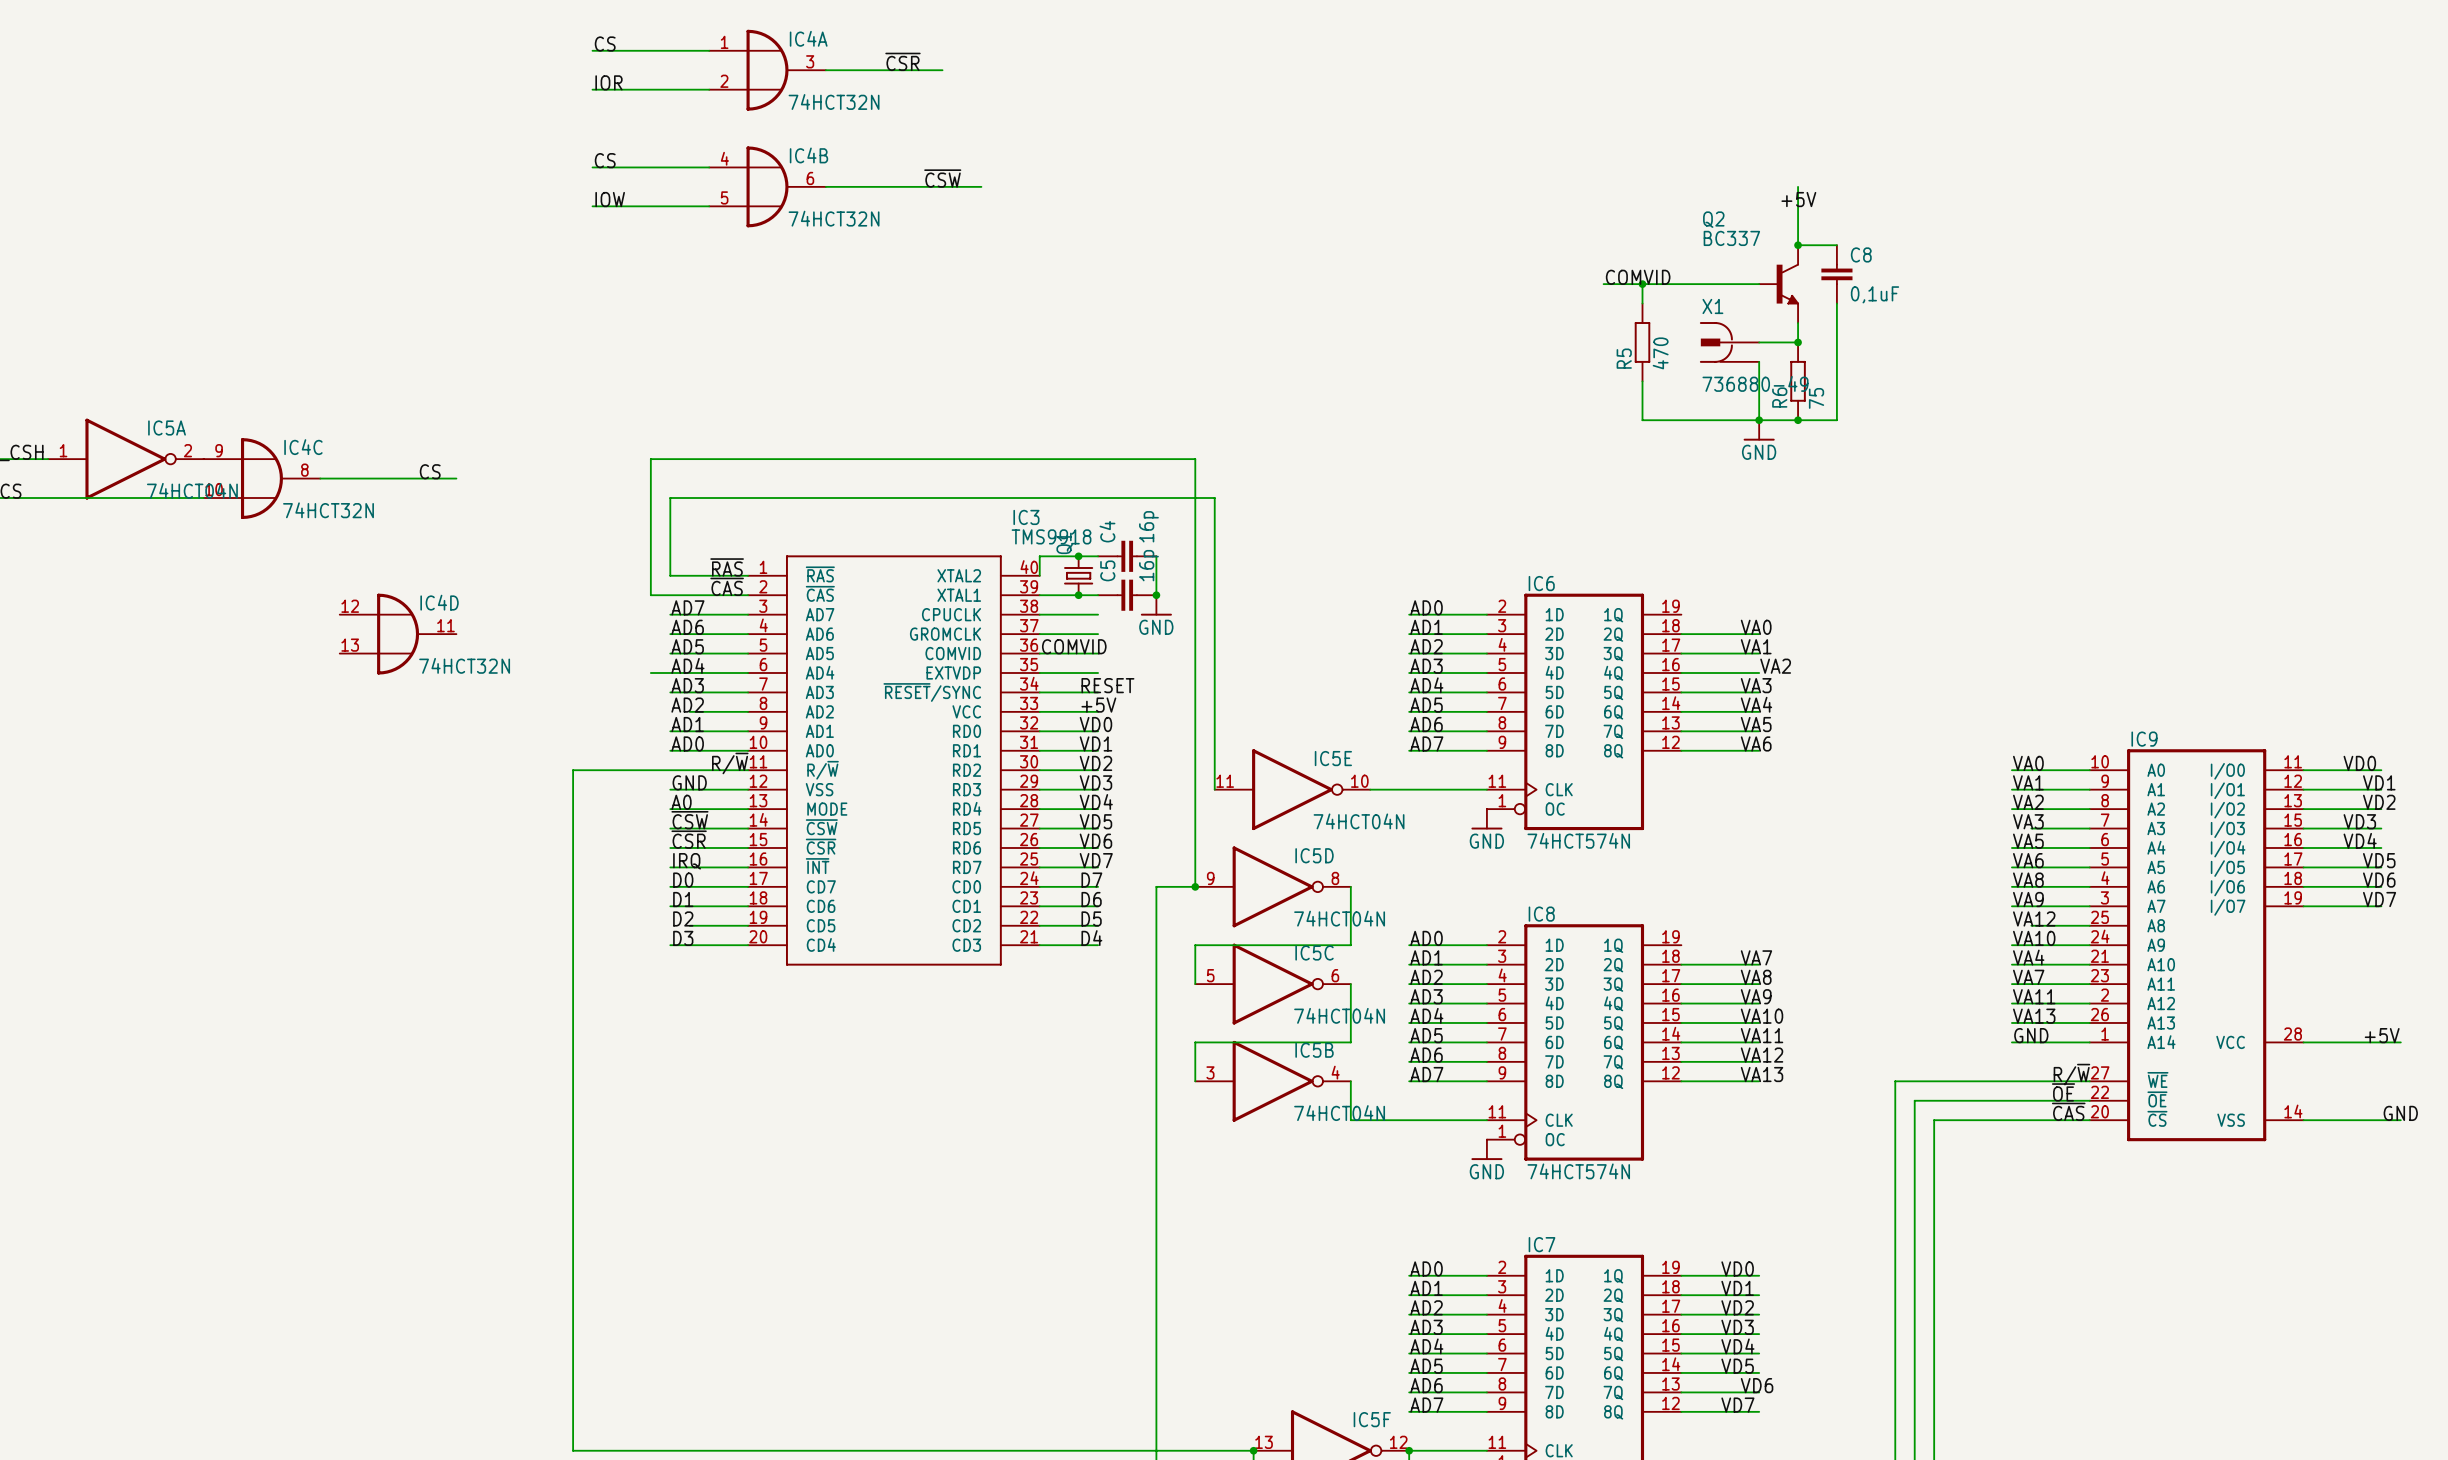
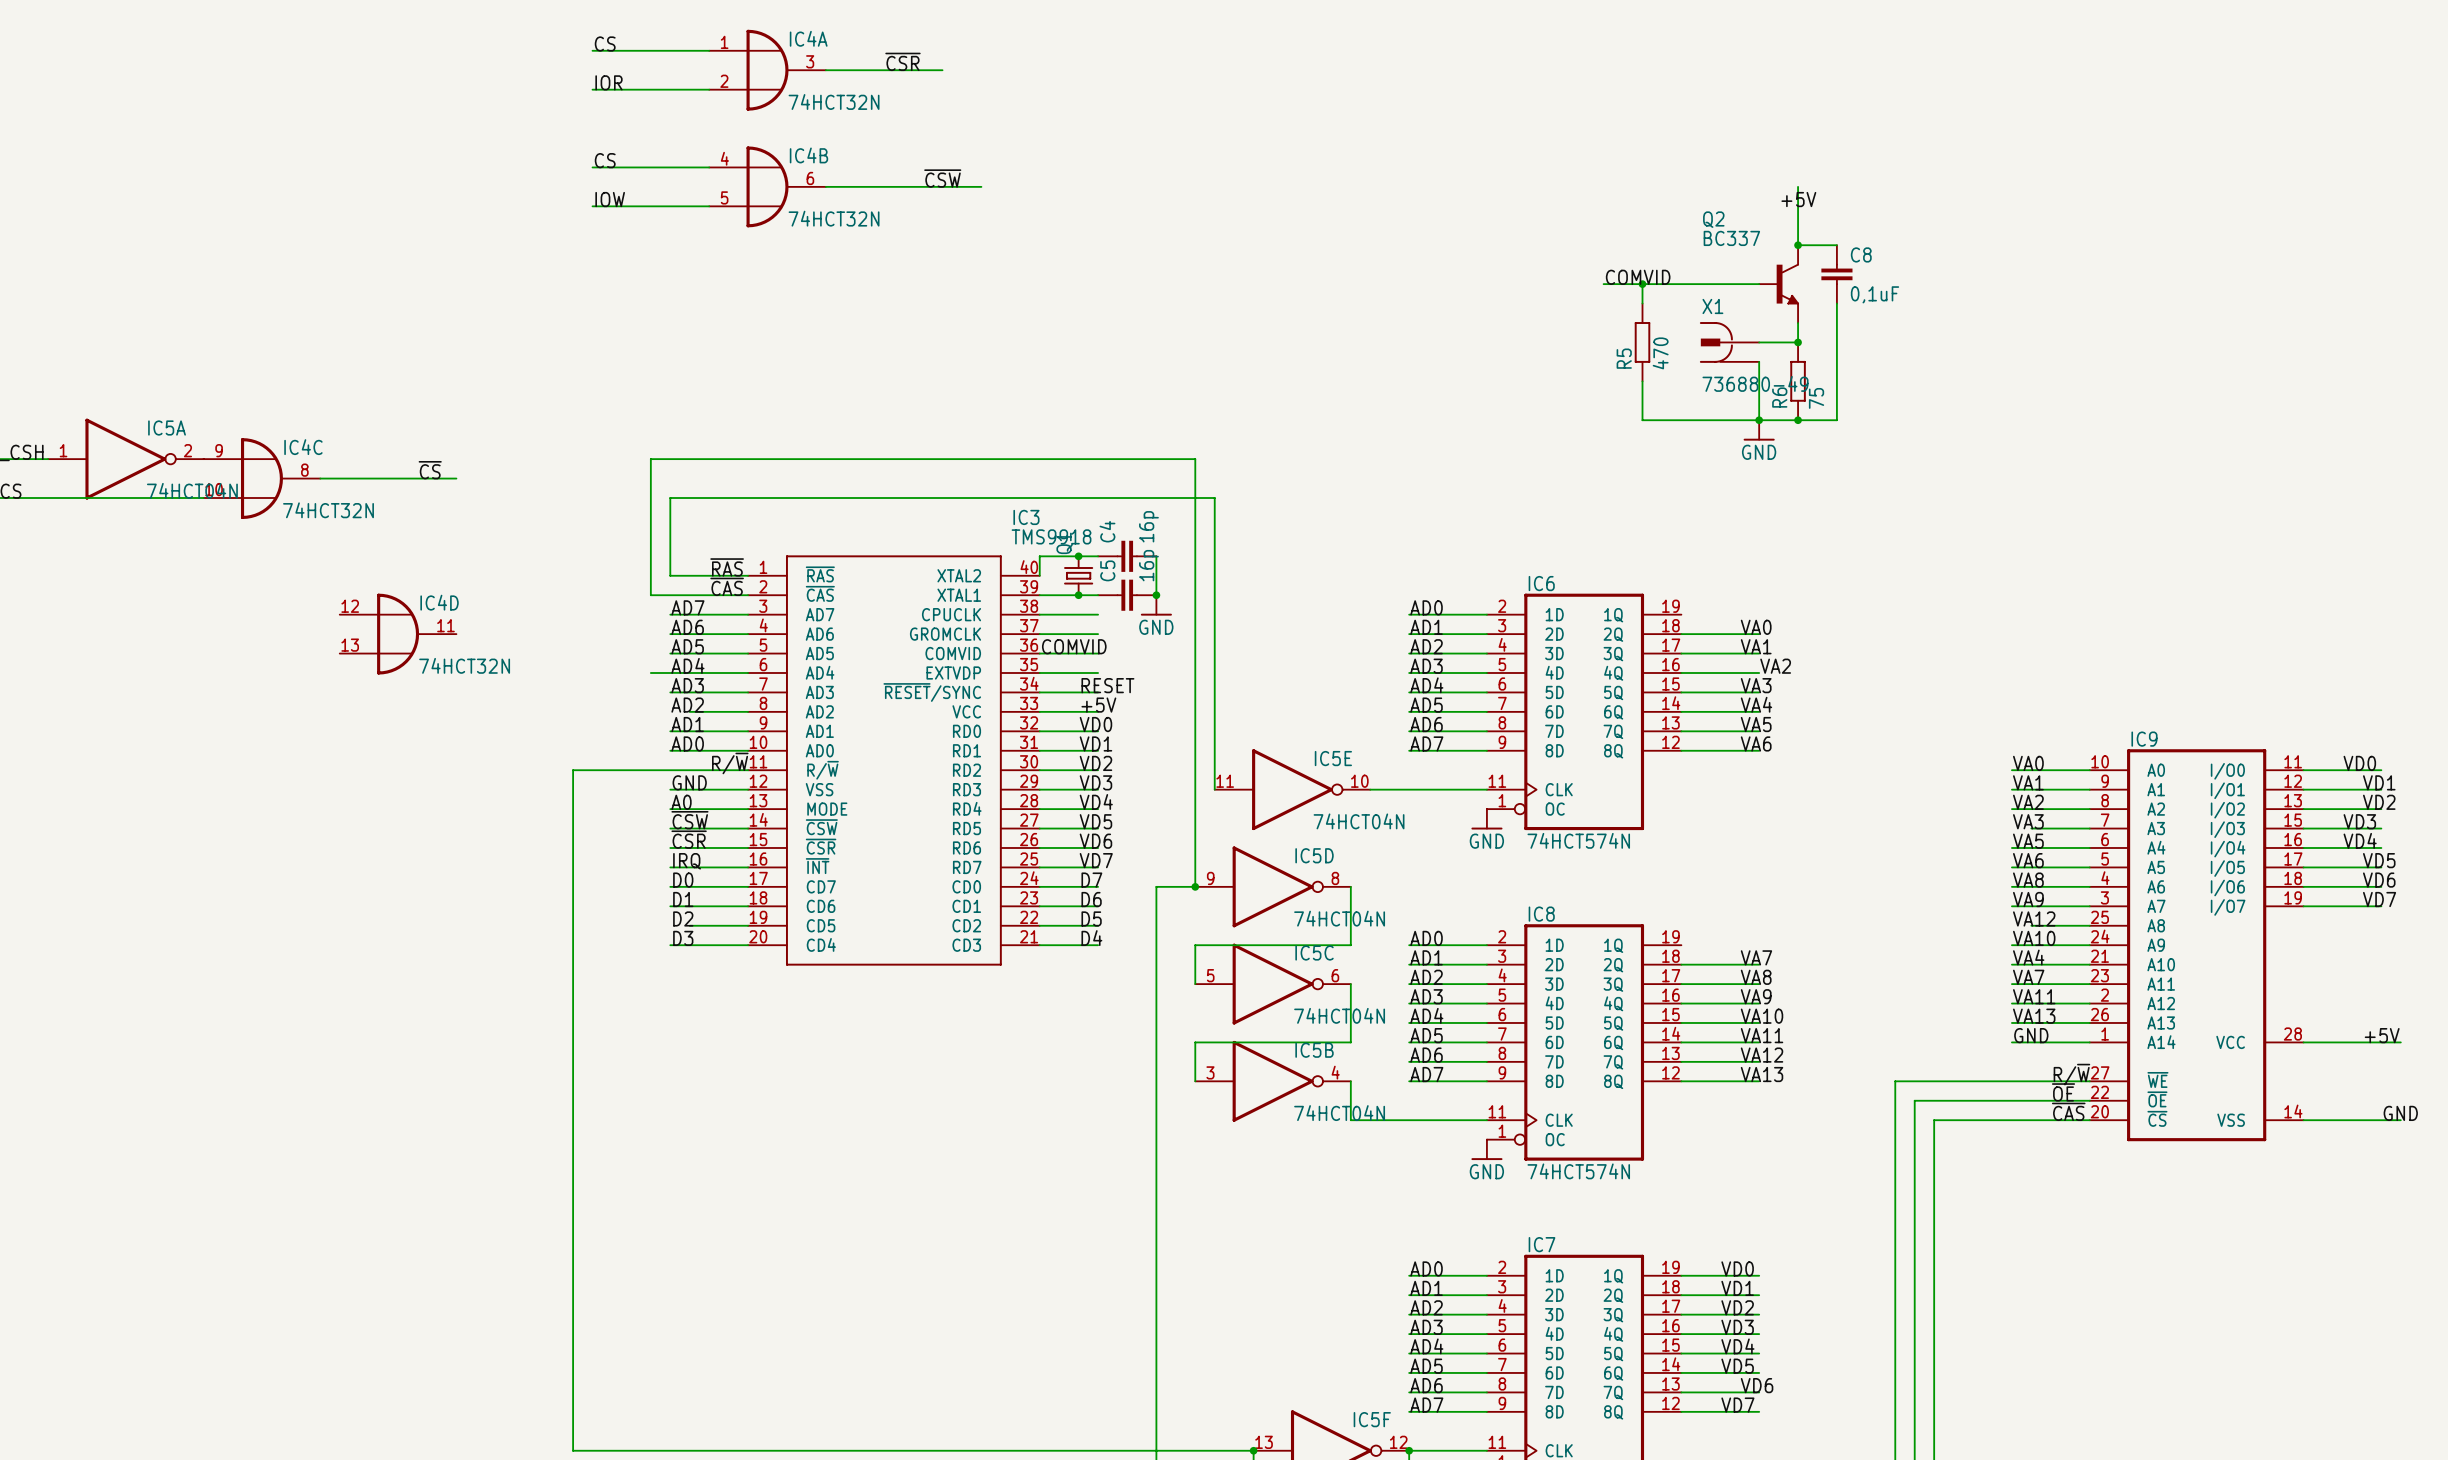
label: CS (430, 471) -> ~{CS} (430, 470)

